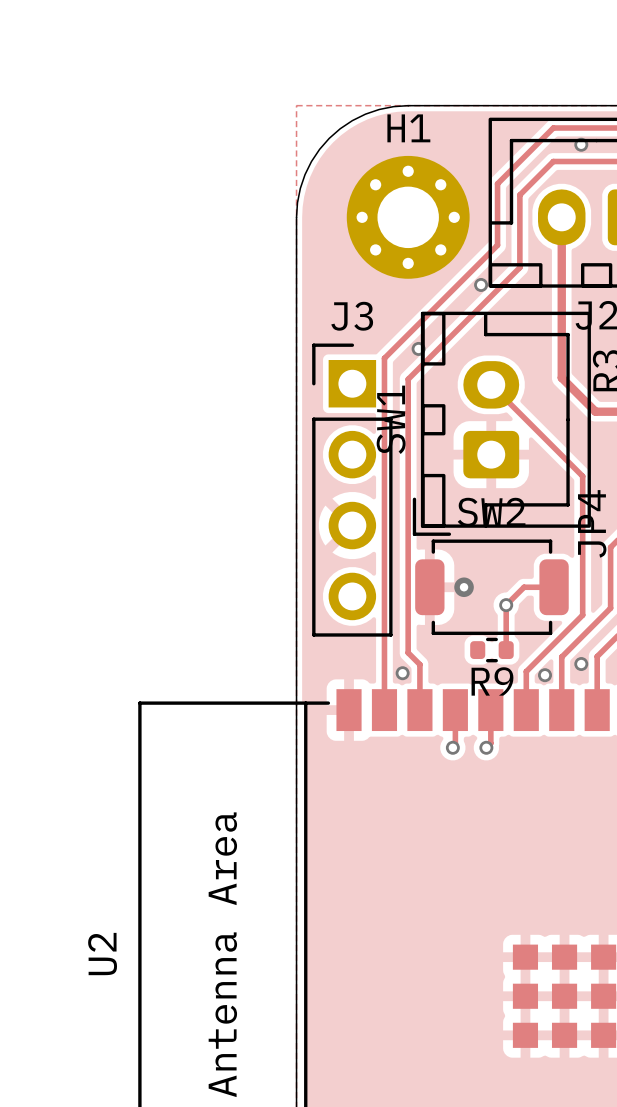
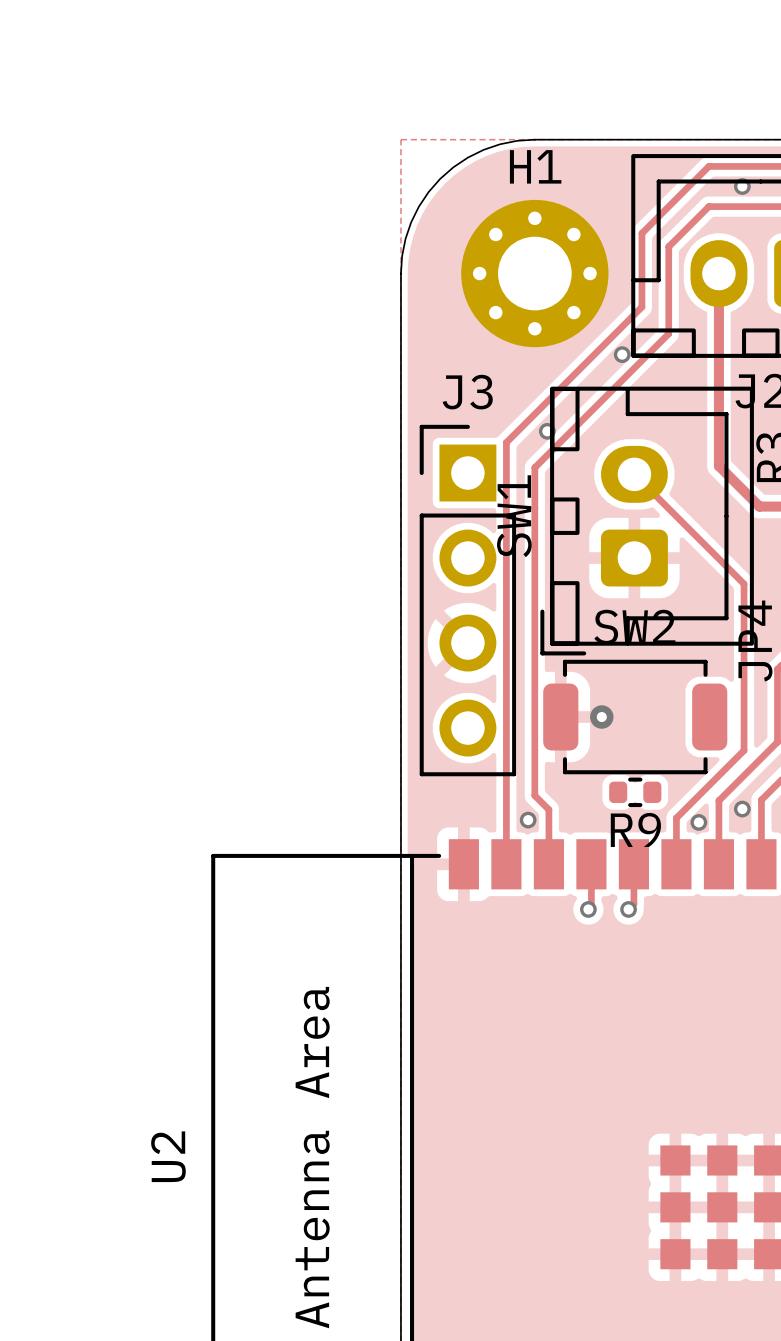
track: (554, 587) (524, 587) (506, 605) (506, 650) -> none
via: (506, 605) -> none

